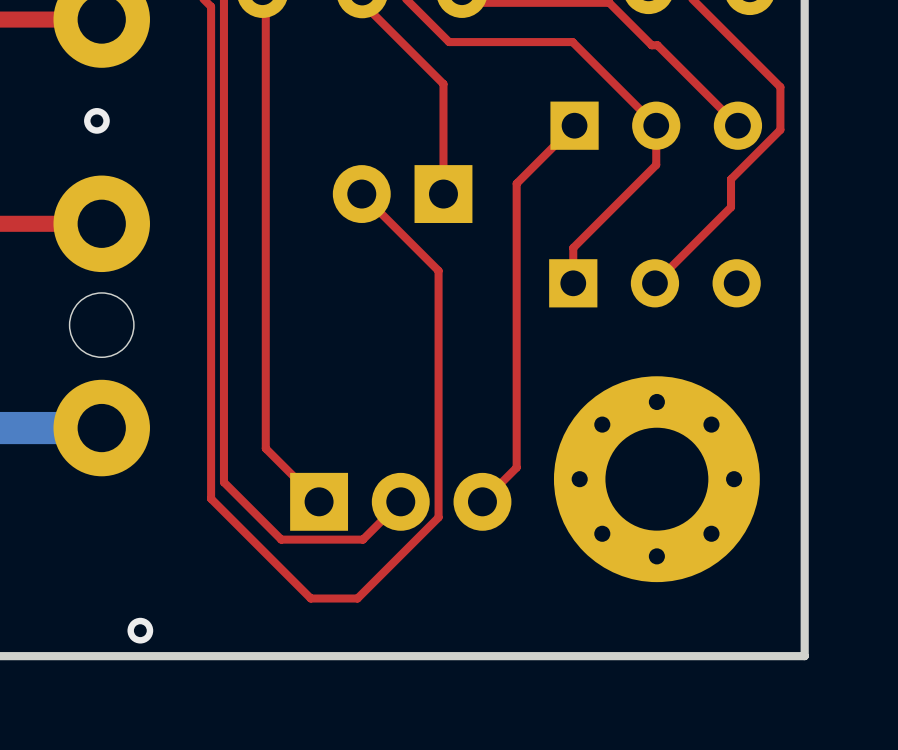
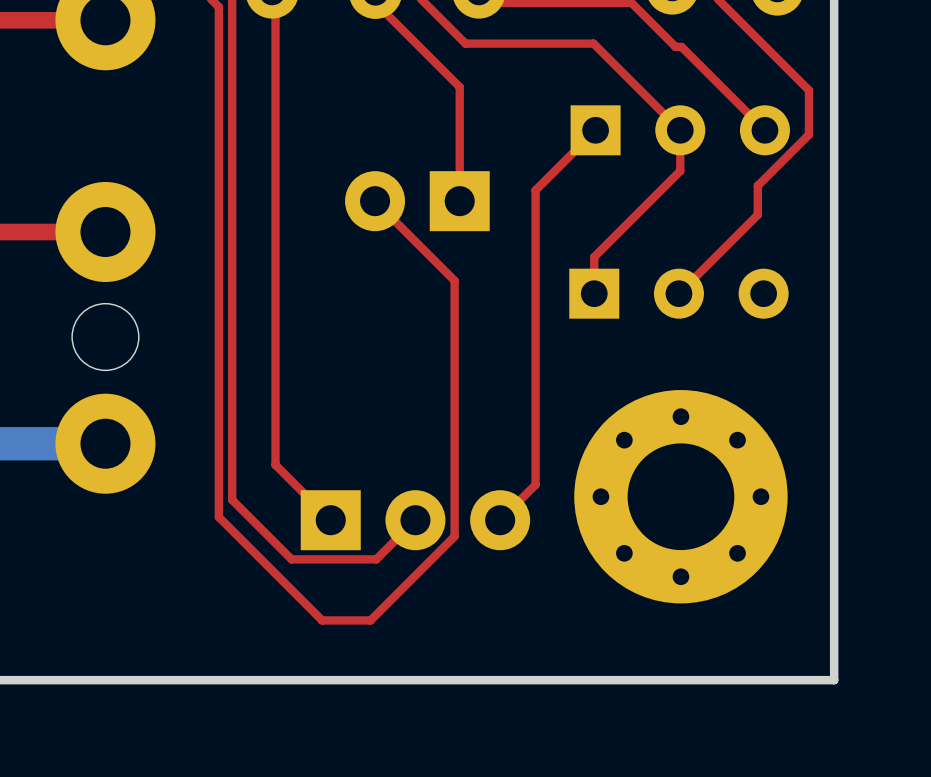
via: (96, 120) -> none
via: (140, 630) -> none

